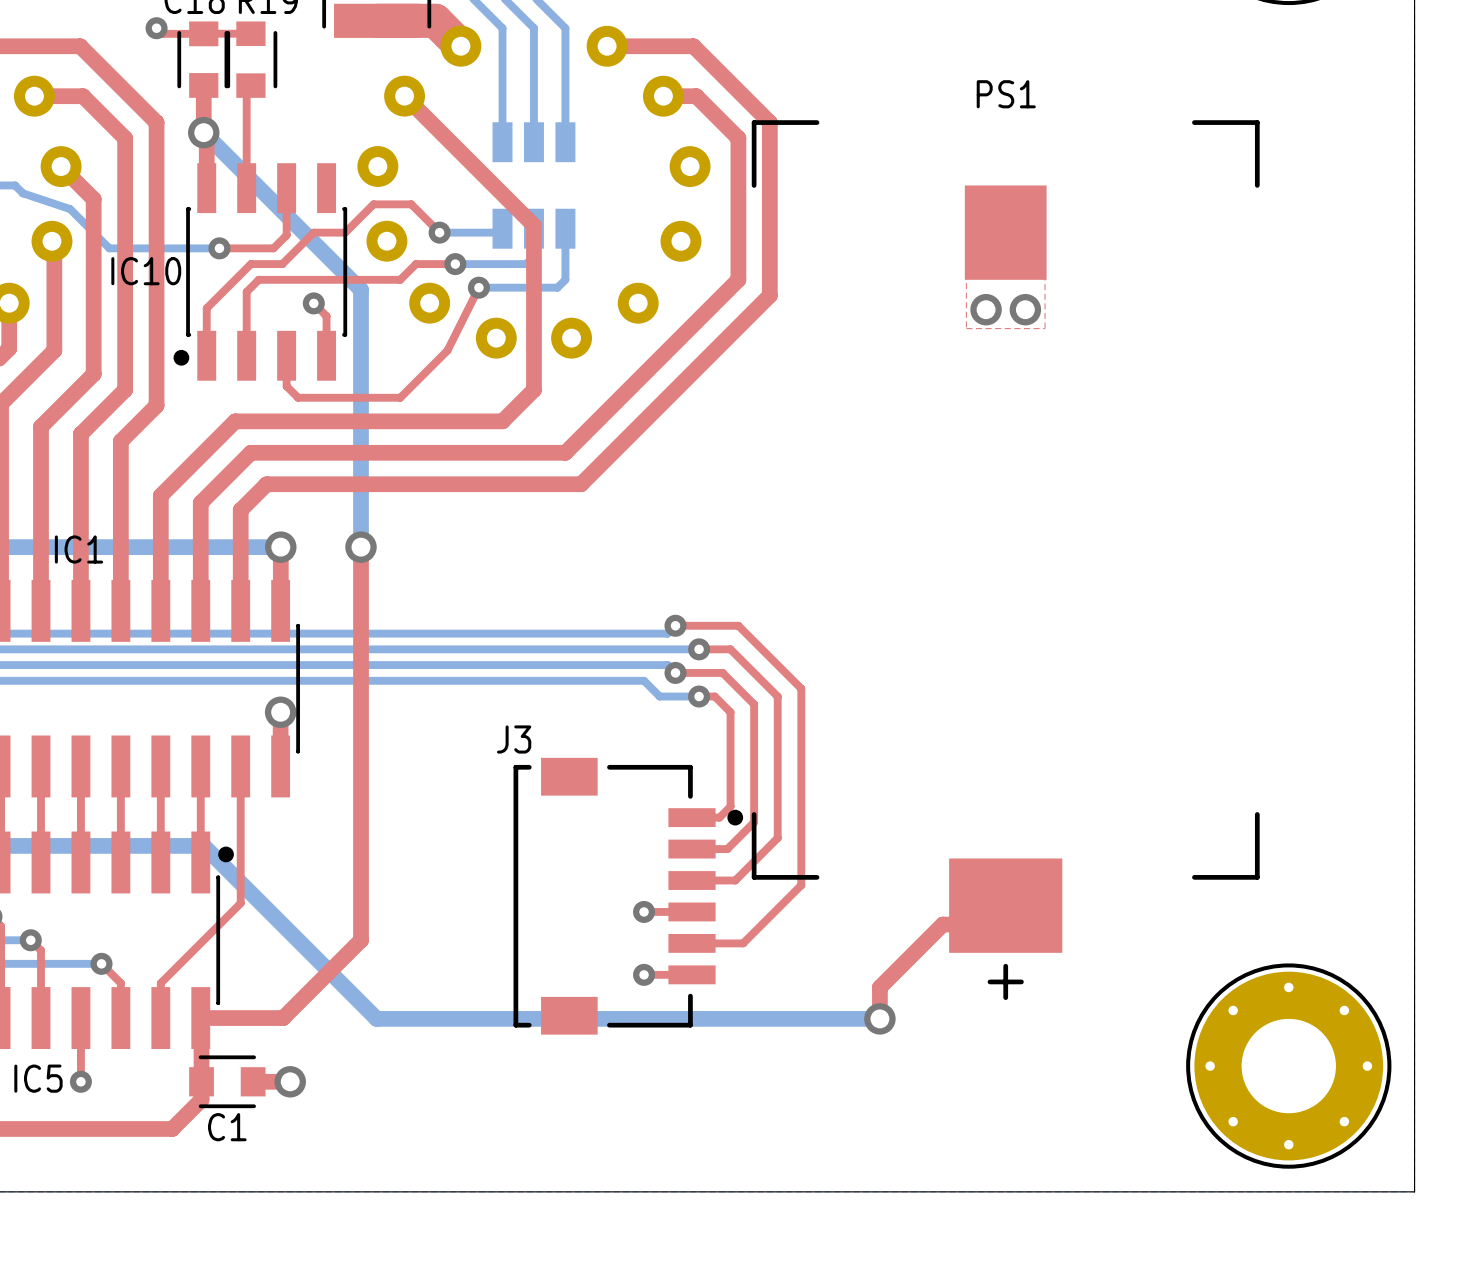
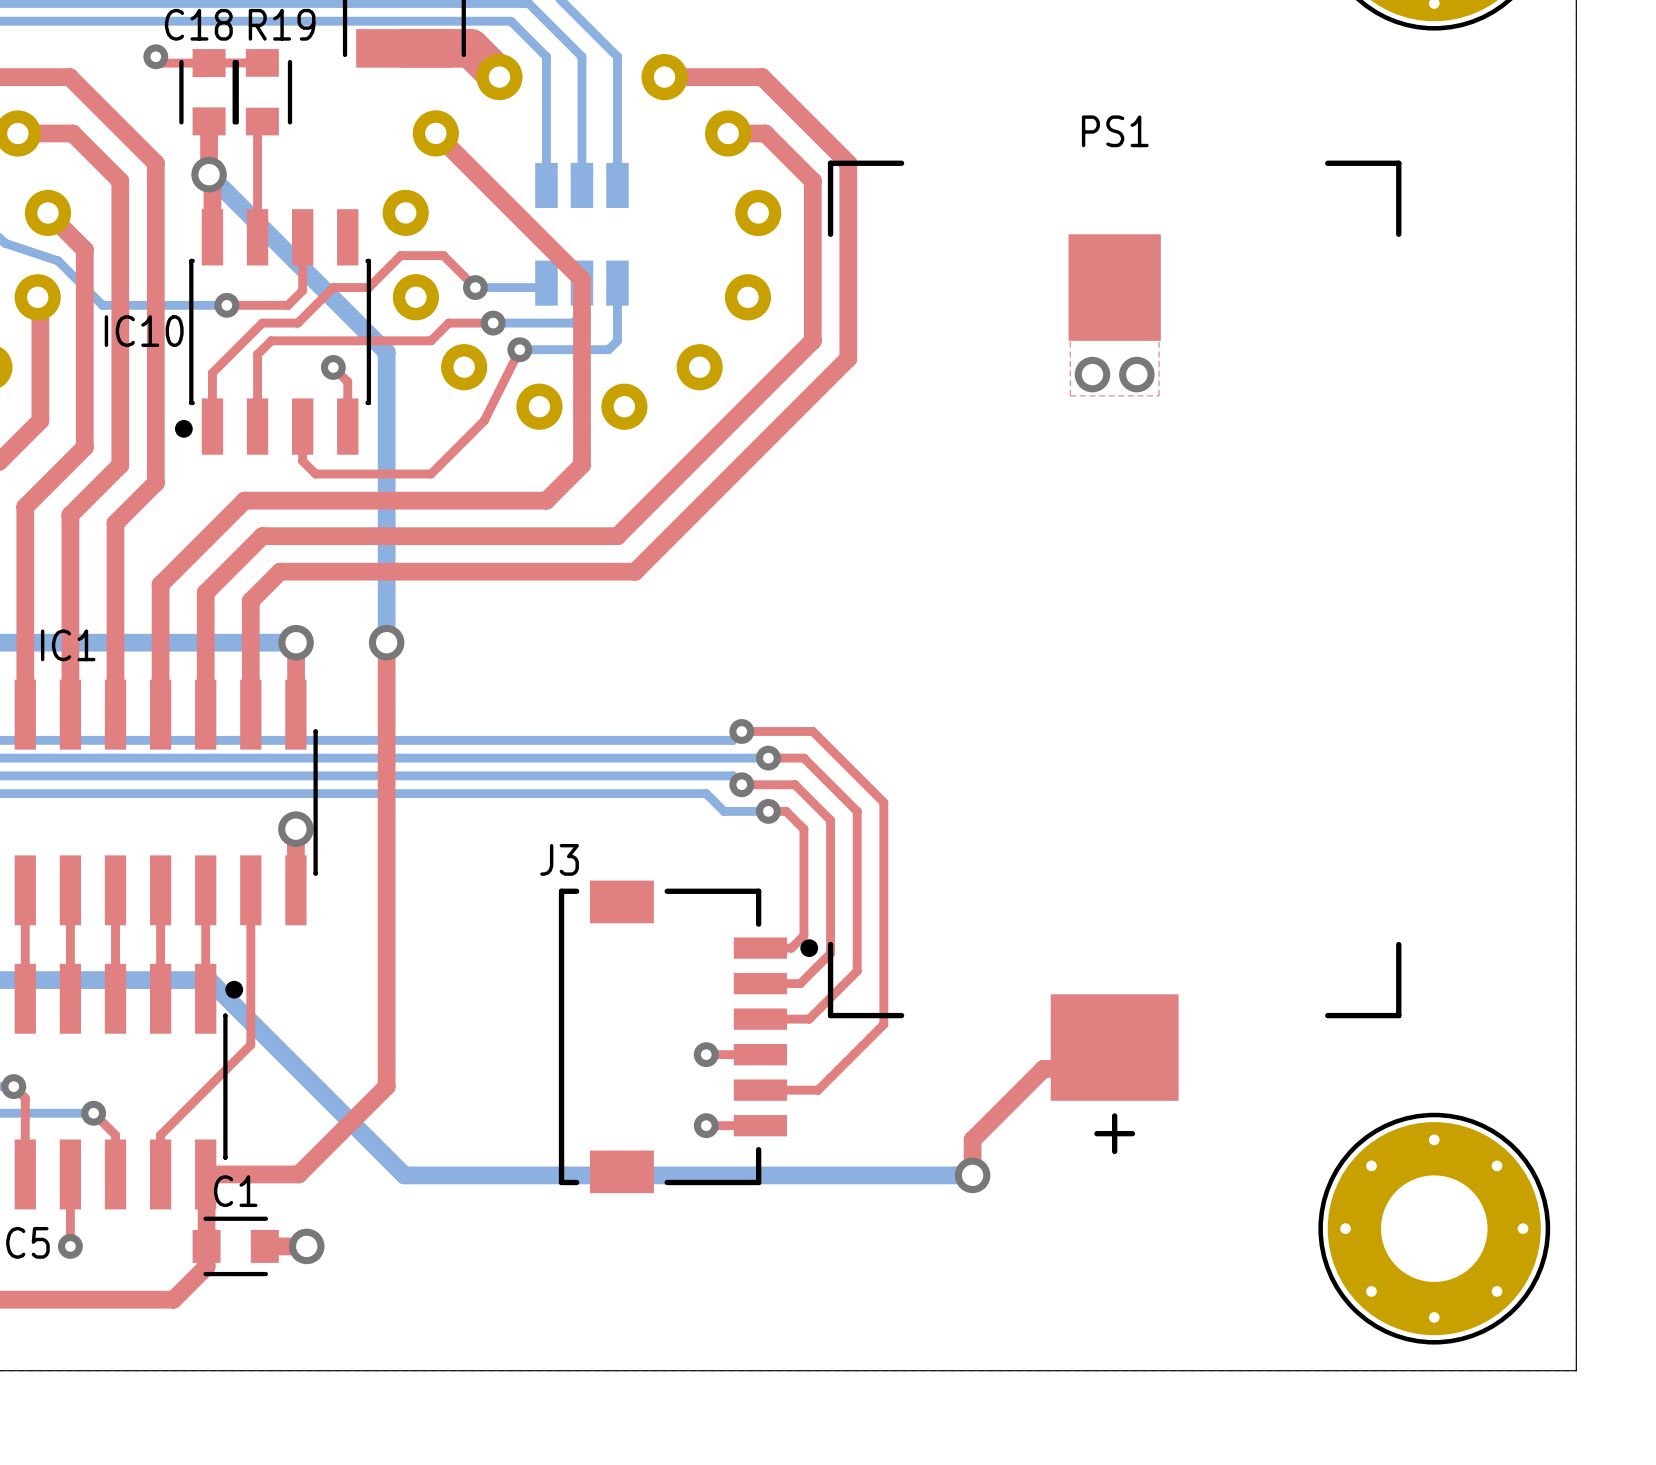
C1 name position: C1 (227, 1127) -> C1 (235, 1191)

